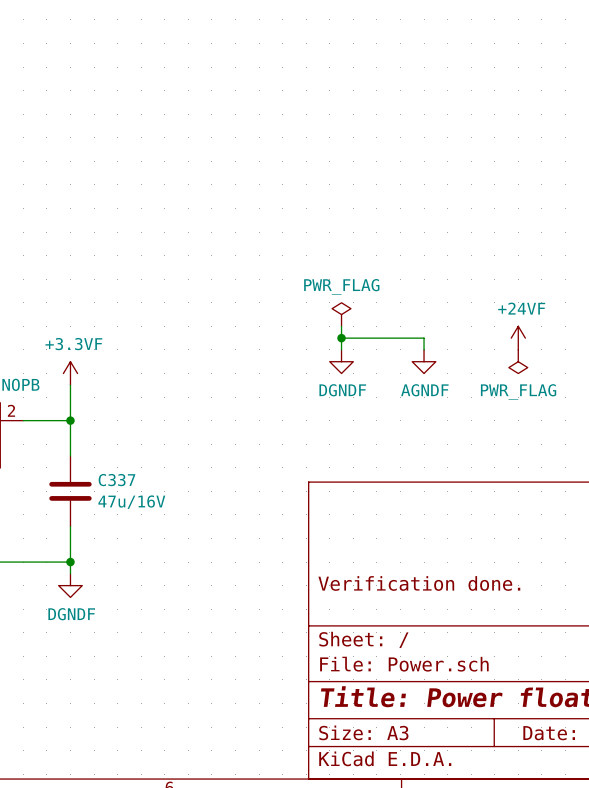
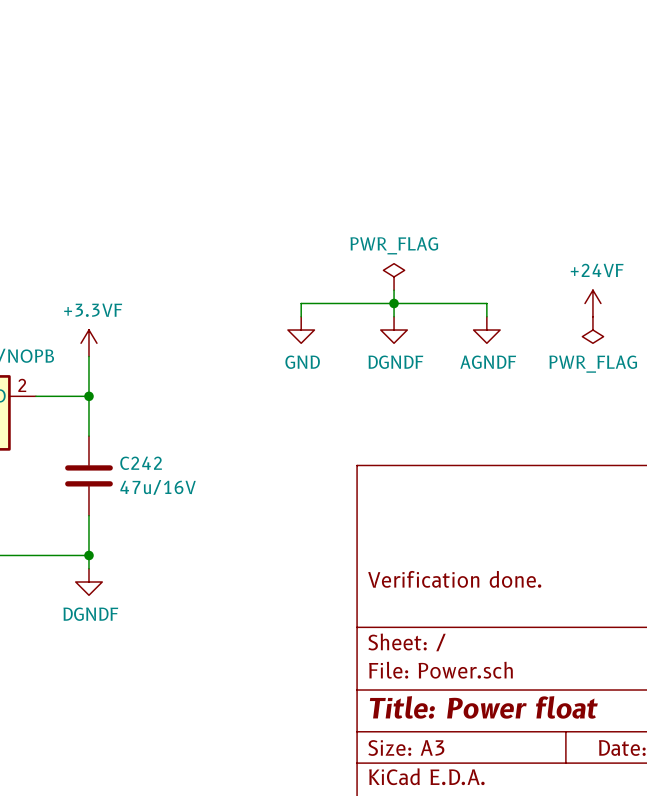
wire: none -> (394, 303) (301, 303) (301, 316)
power symbol: none -> GND (301, 330)
C337 name: C337 (116, 480) -> C242 (141, 463)

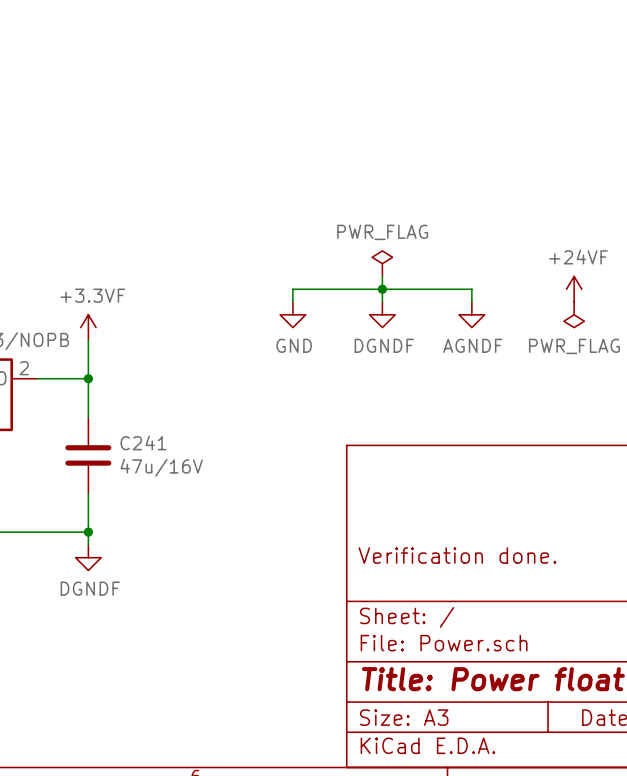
C242 name: C242 (141, 463) -> C241 (143, 442)

